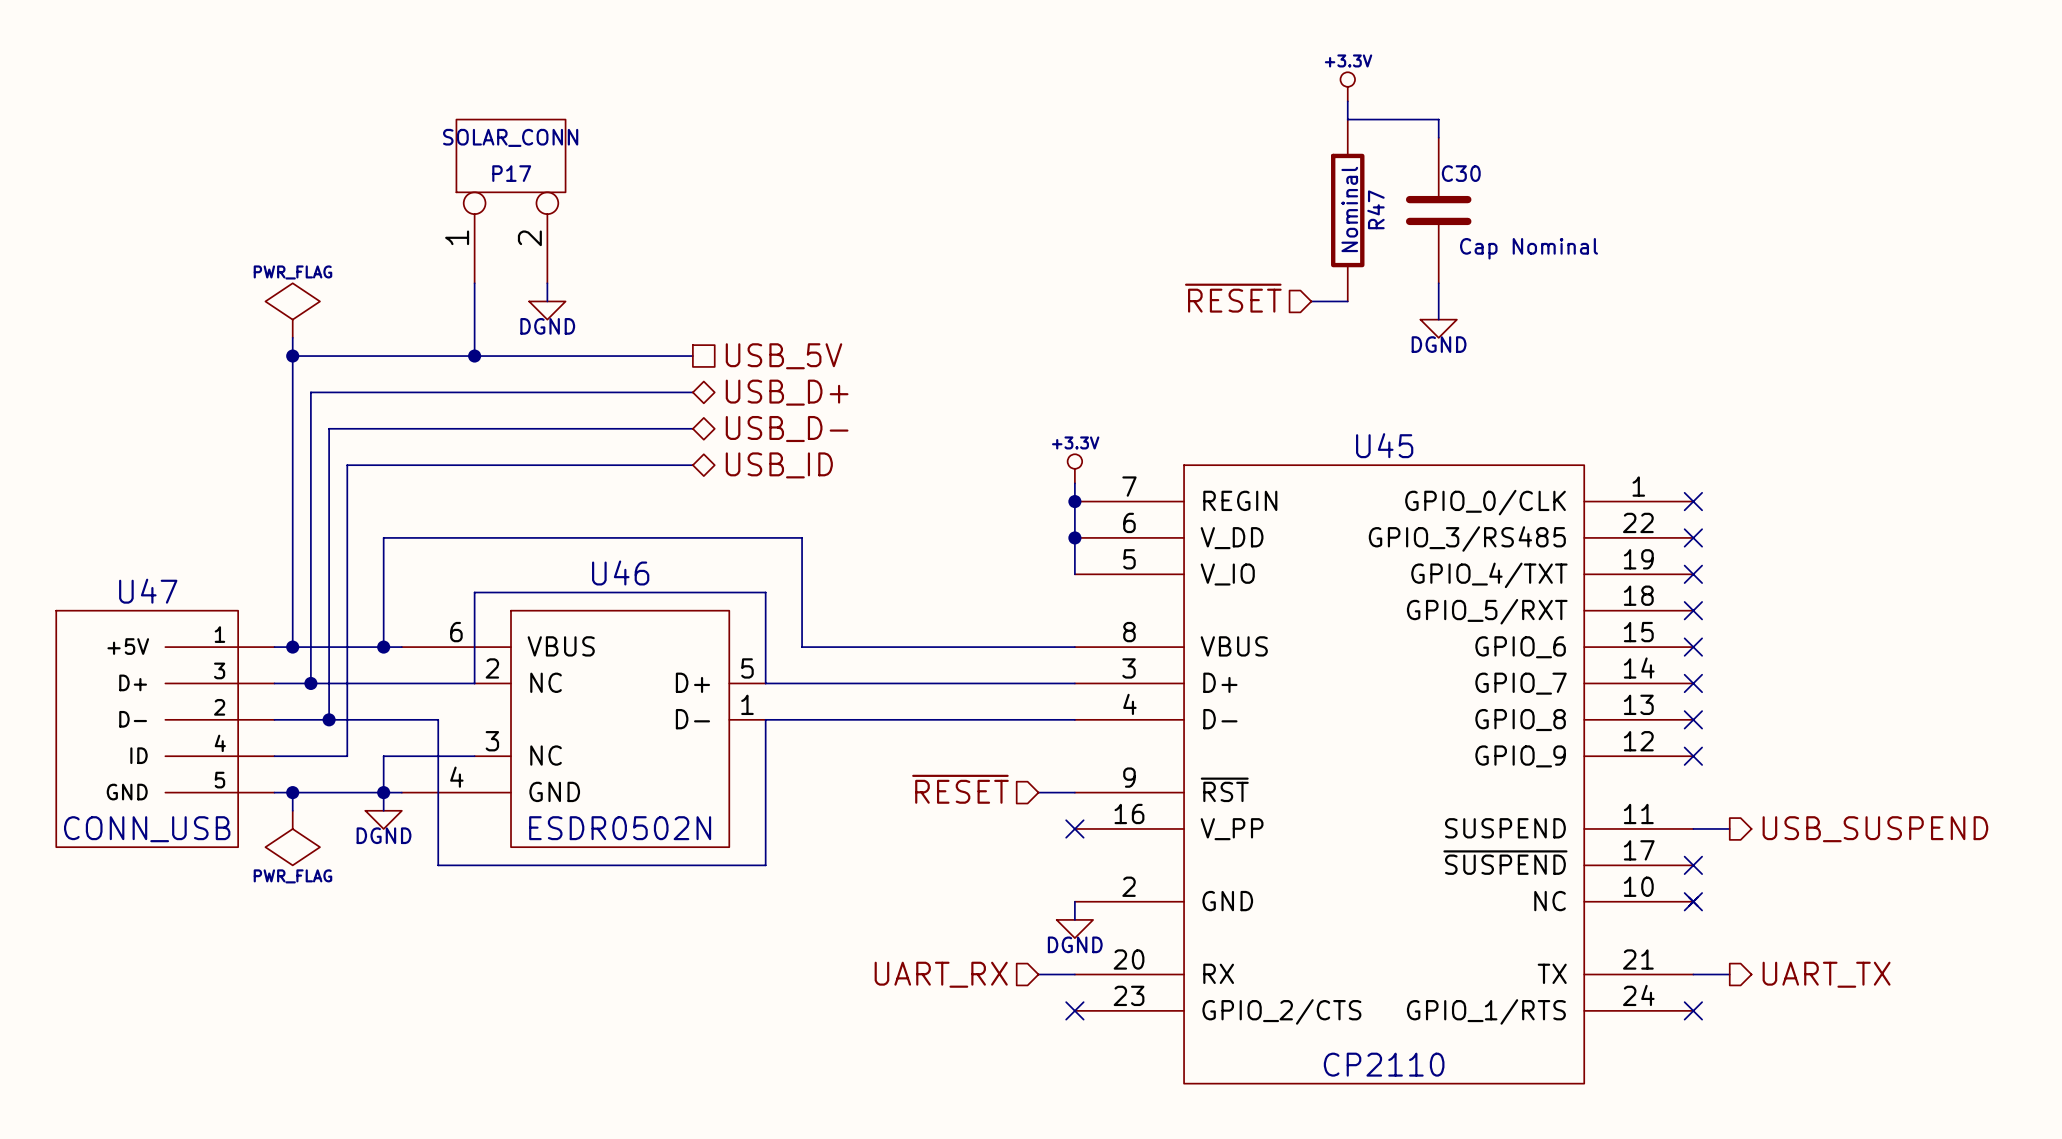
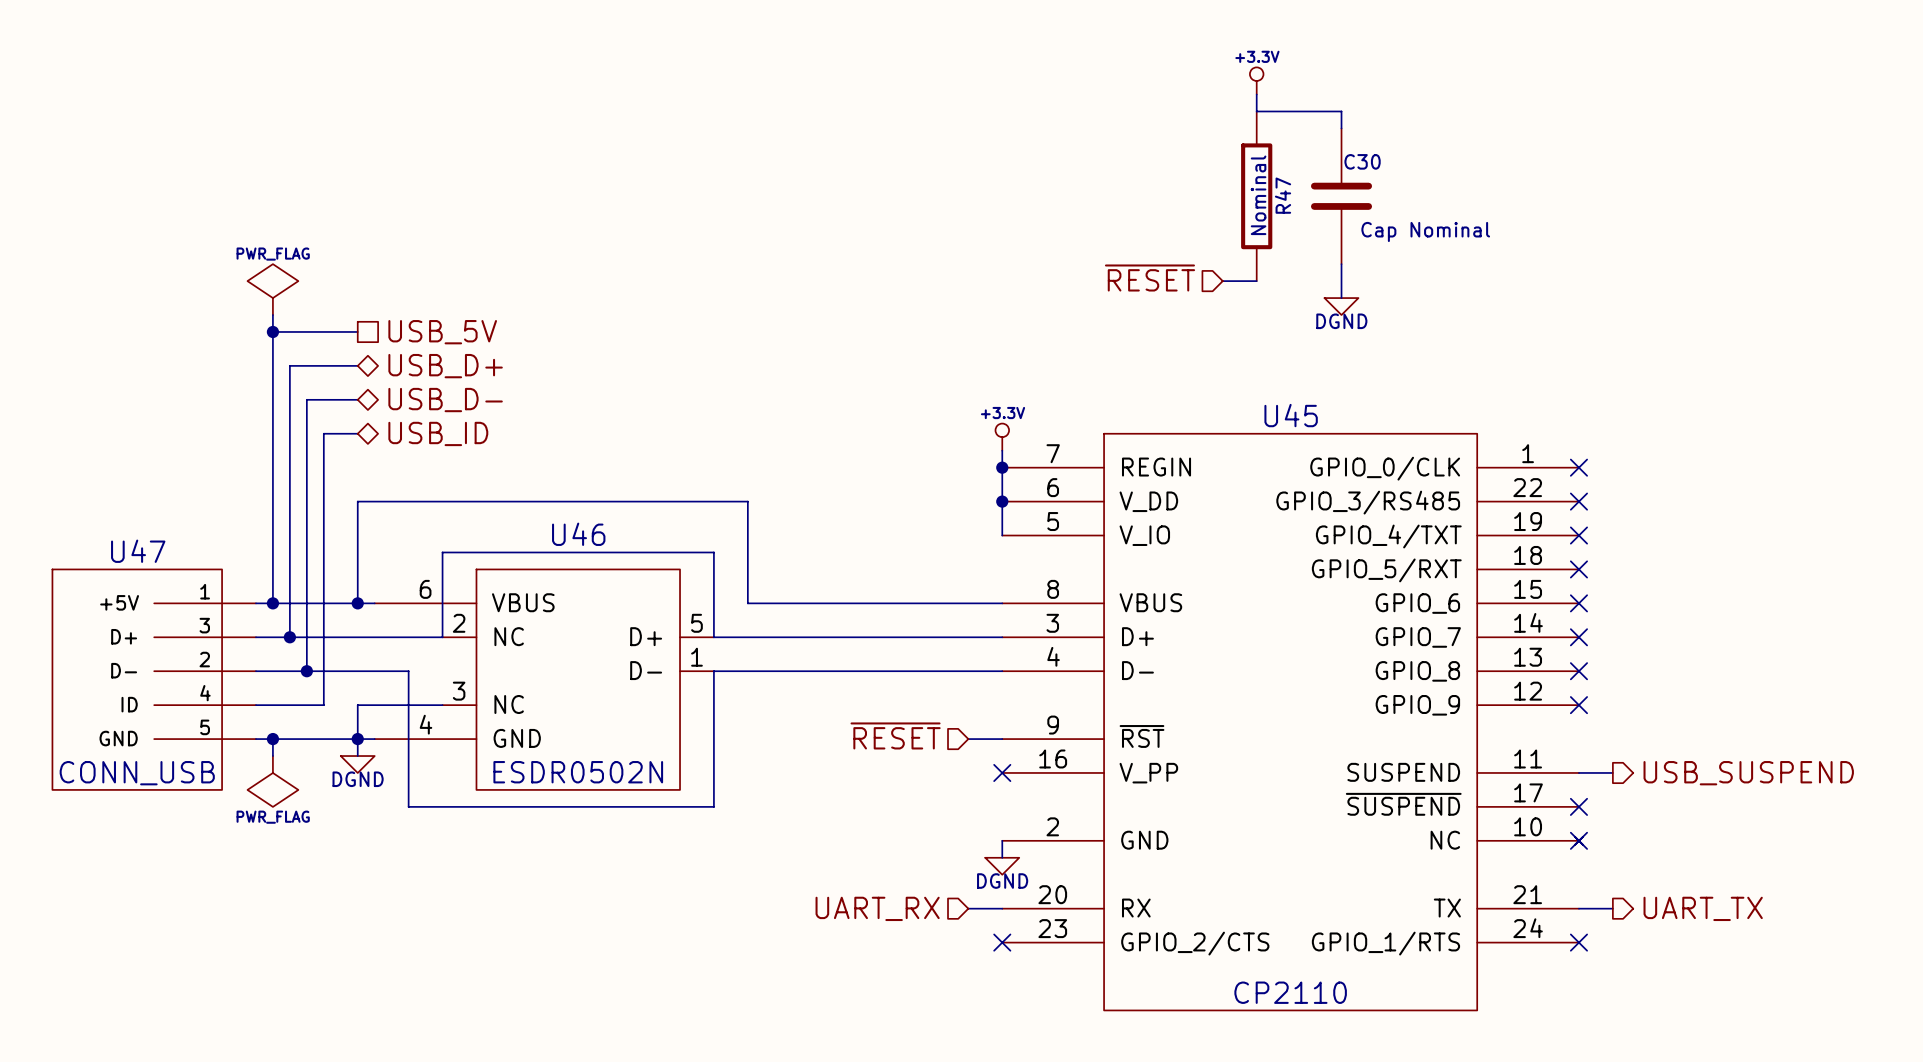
P17: SOLAR_CONN (511, 201) -> none
wire: (474, 283) (474, 356) -> none
wire: (547, 283) (547, 301) -> none
power symbol: DGND (547, 310) -> none
wire: (383, 356) (692, 356) -> none
junction: (474, 356) -> none
hierarchical label position: USB_5V (783, 356) -> USB_5V (442, 332)
wire: (383, 392) (692, 392) -> none
hierarchical label position: USB_D+ (787, 392) -> USB_D+ (445, 366)
wire: (383, 428) (692, 428) -> none
hierarchical label position: USB_D- (787, 429) -> USB_D- (445, 400)
wire: (383, 465) (692, 465) -> none
hierarchical label position: USB_ID (779, 465) -> USB_ID (438, 433)

